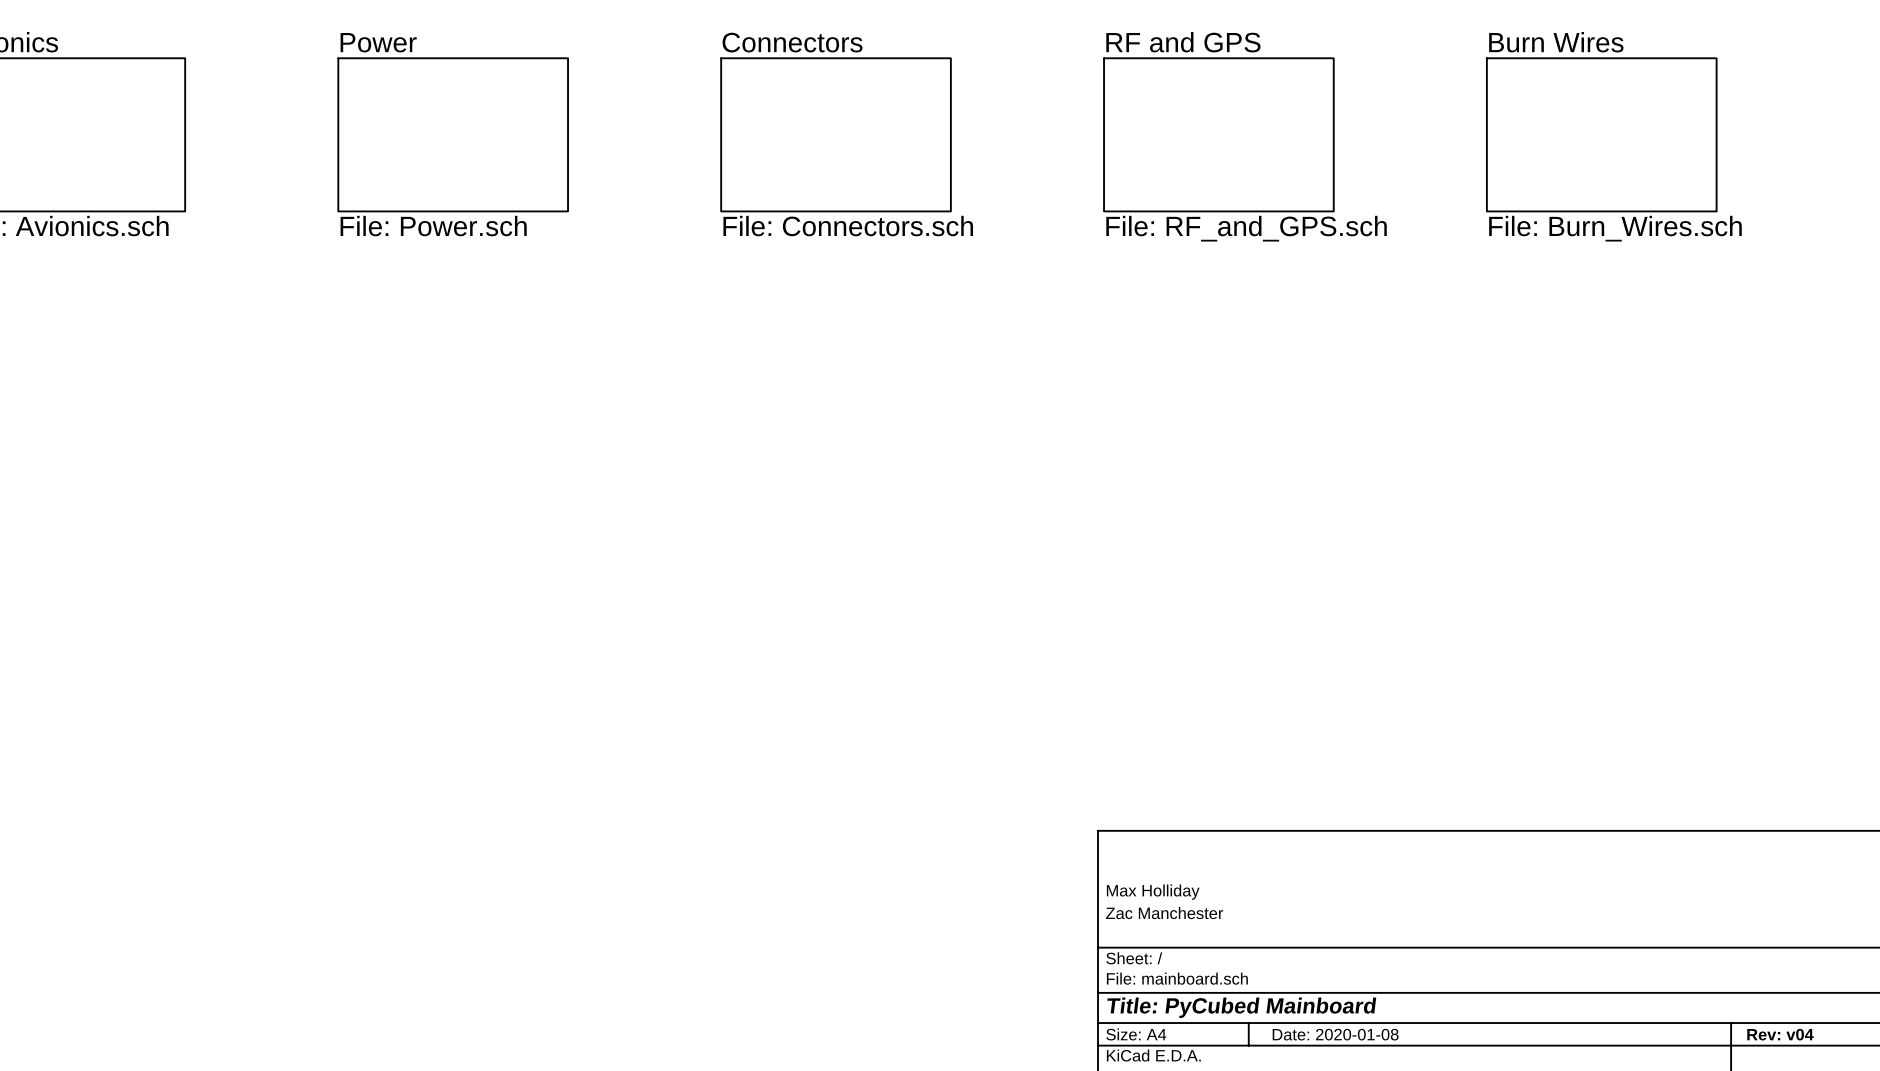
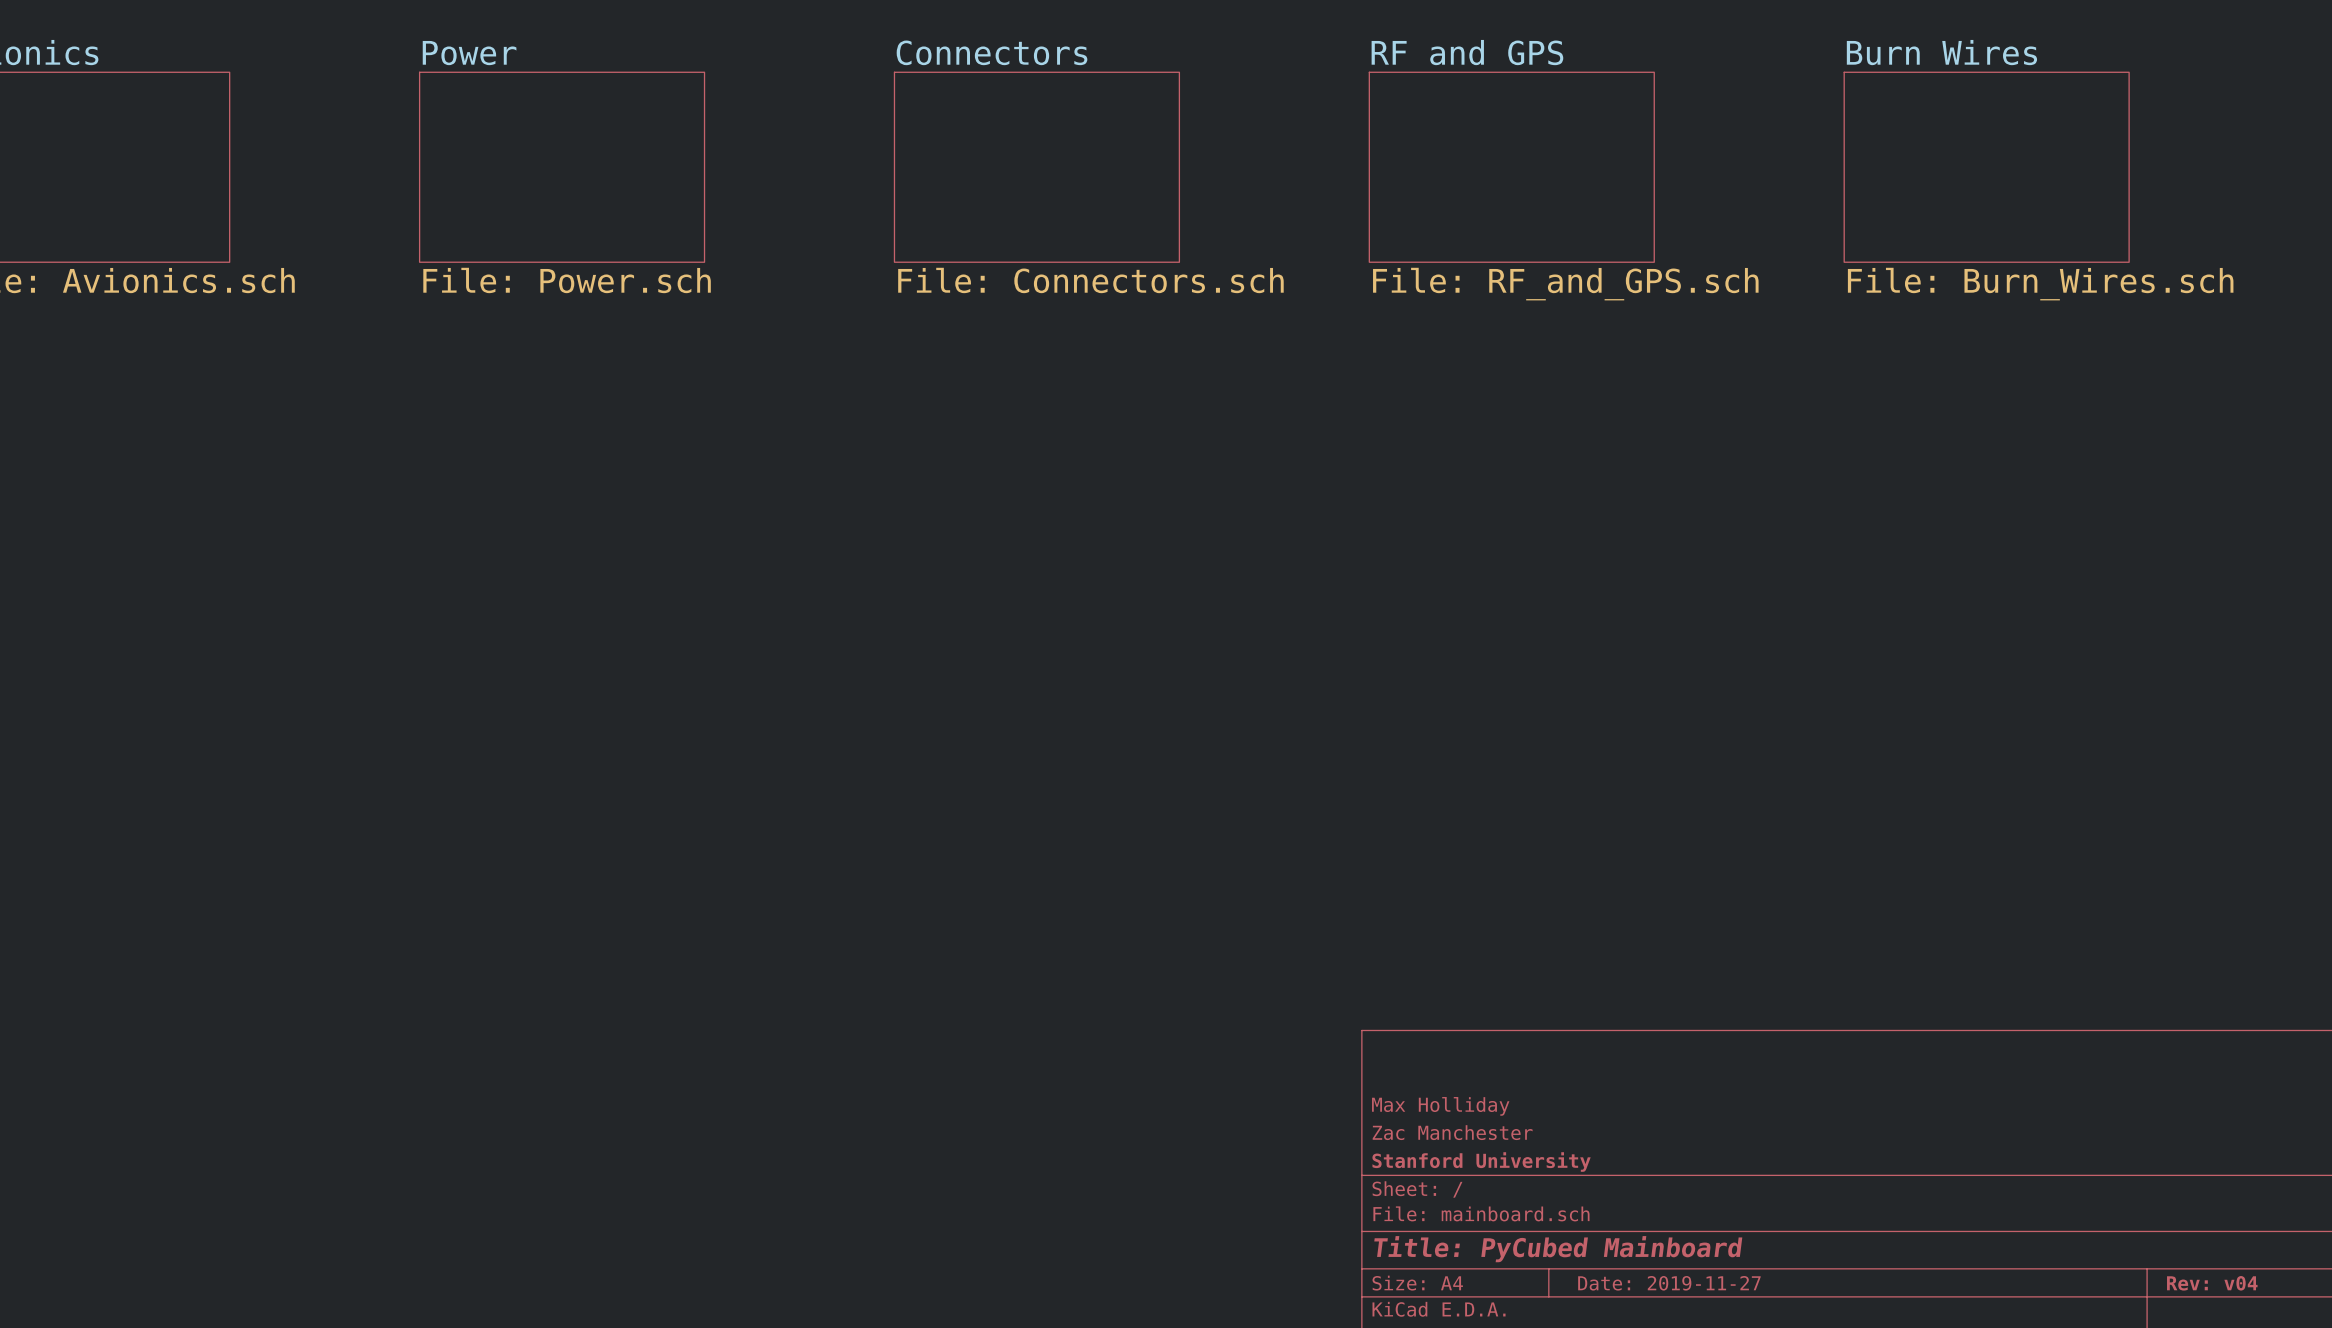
title block: none -> Stanford University (1481, 1162)
title block: Date: 2020-01-08 (1335, 1034) -> Date: 2019-11-27 (1669, 1283)

